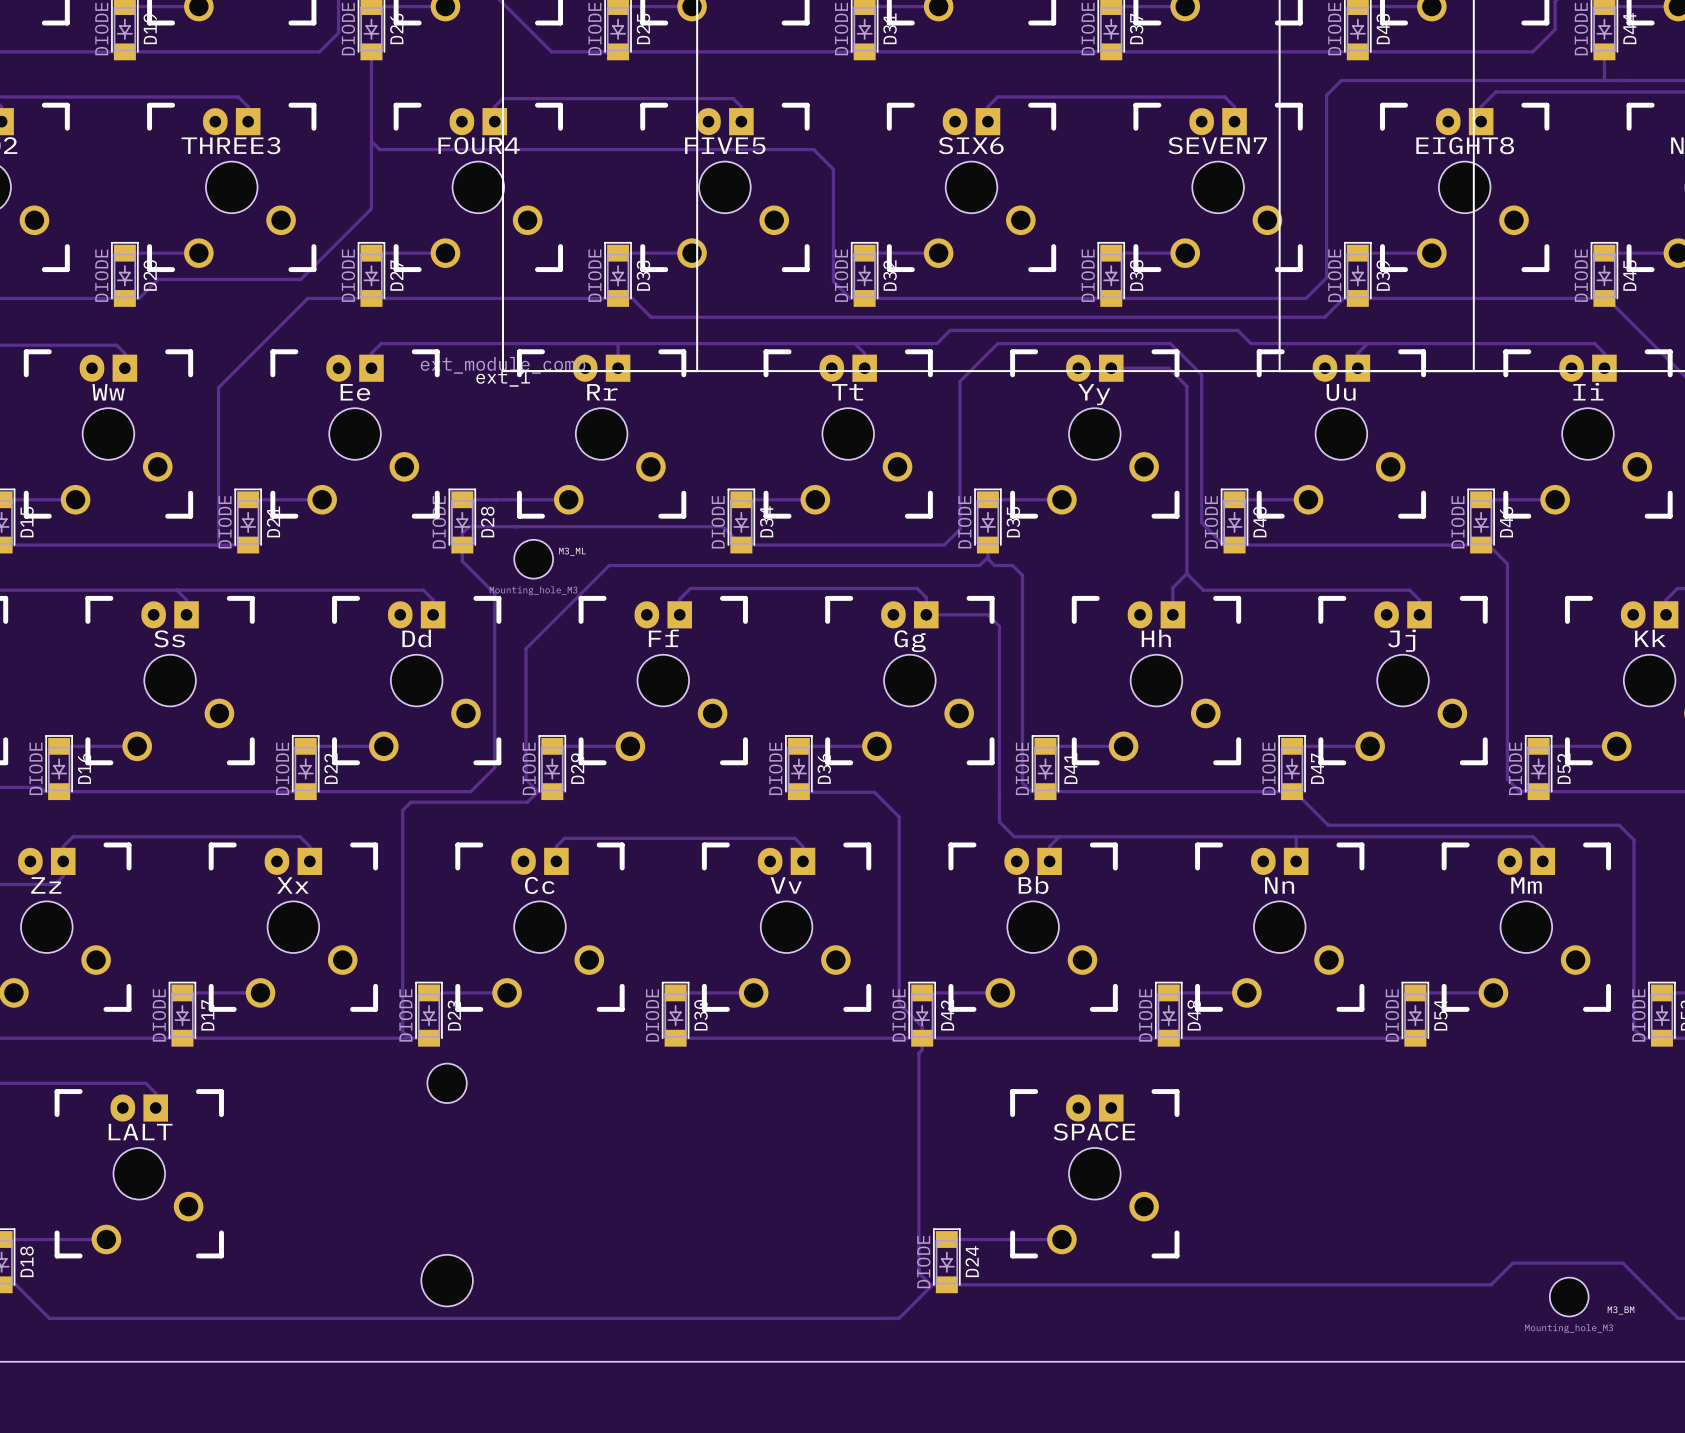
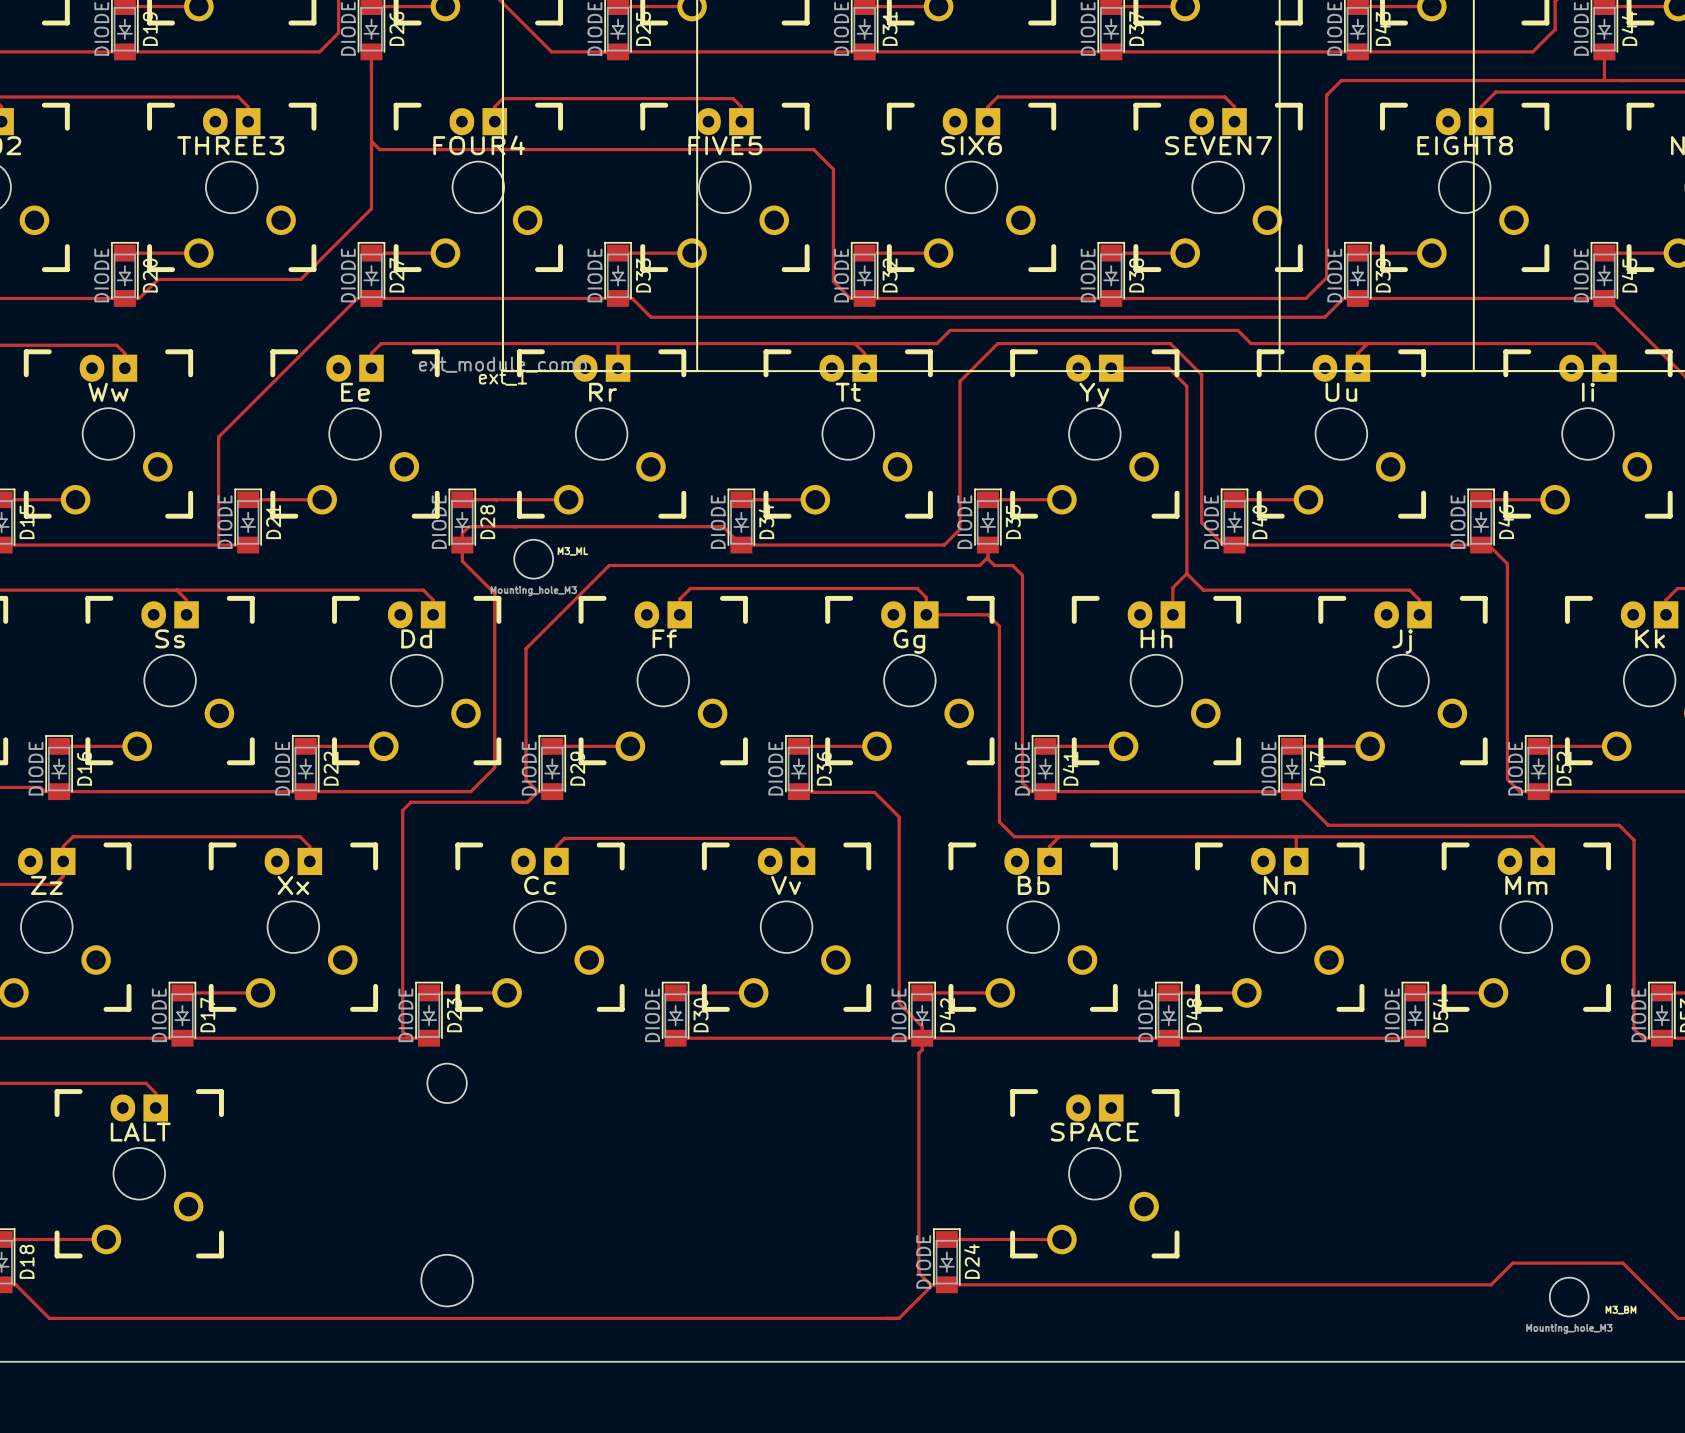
track: (357, 298) (307, 298) (218, 387) (218, 437) -> (357, 298) (218, 437)

